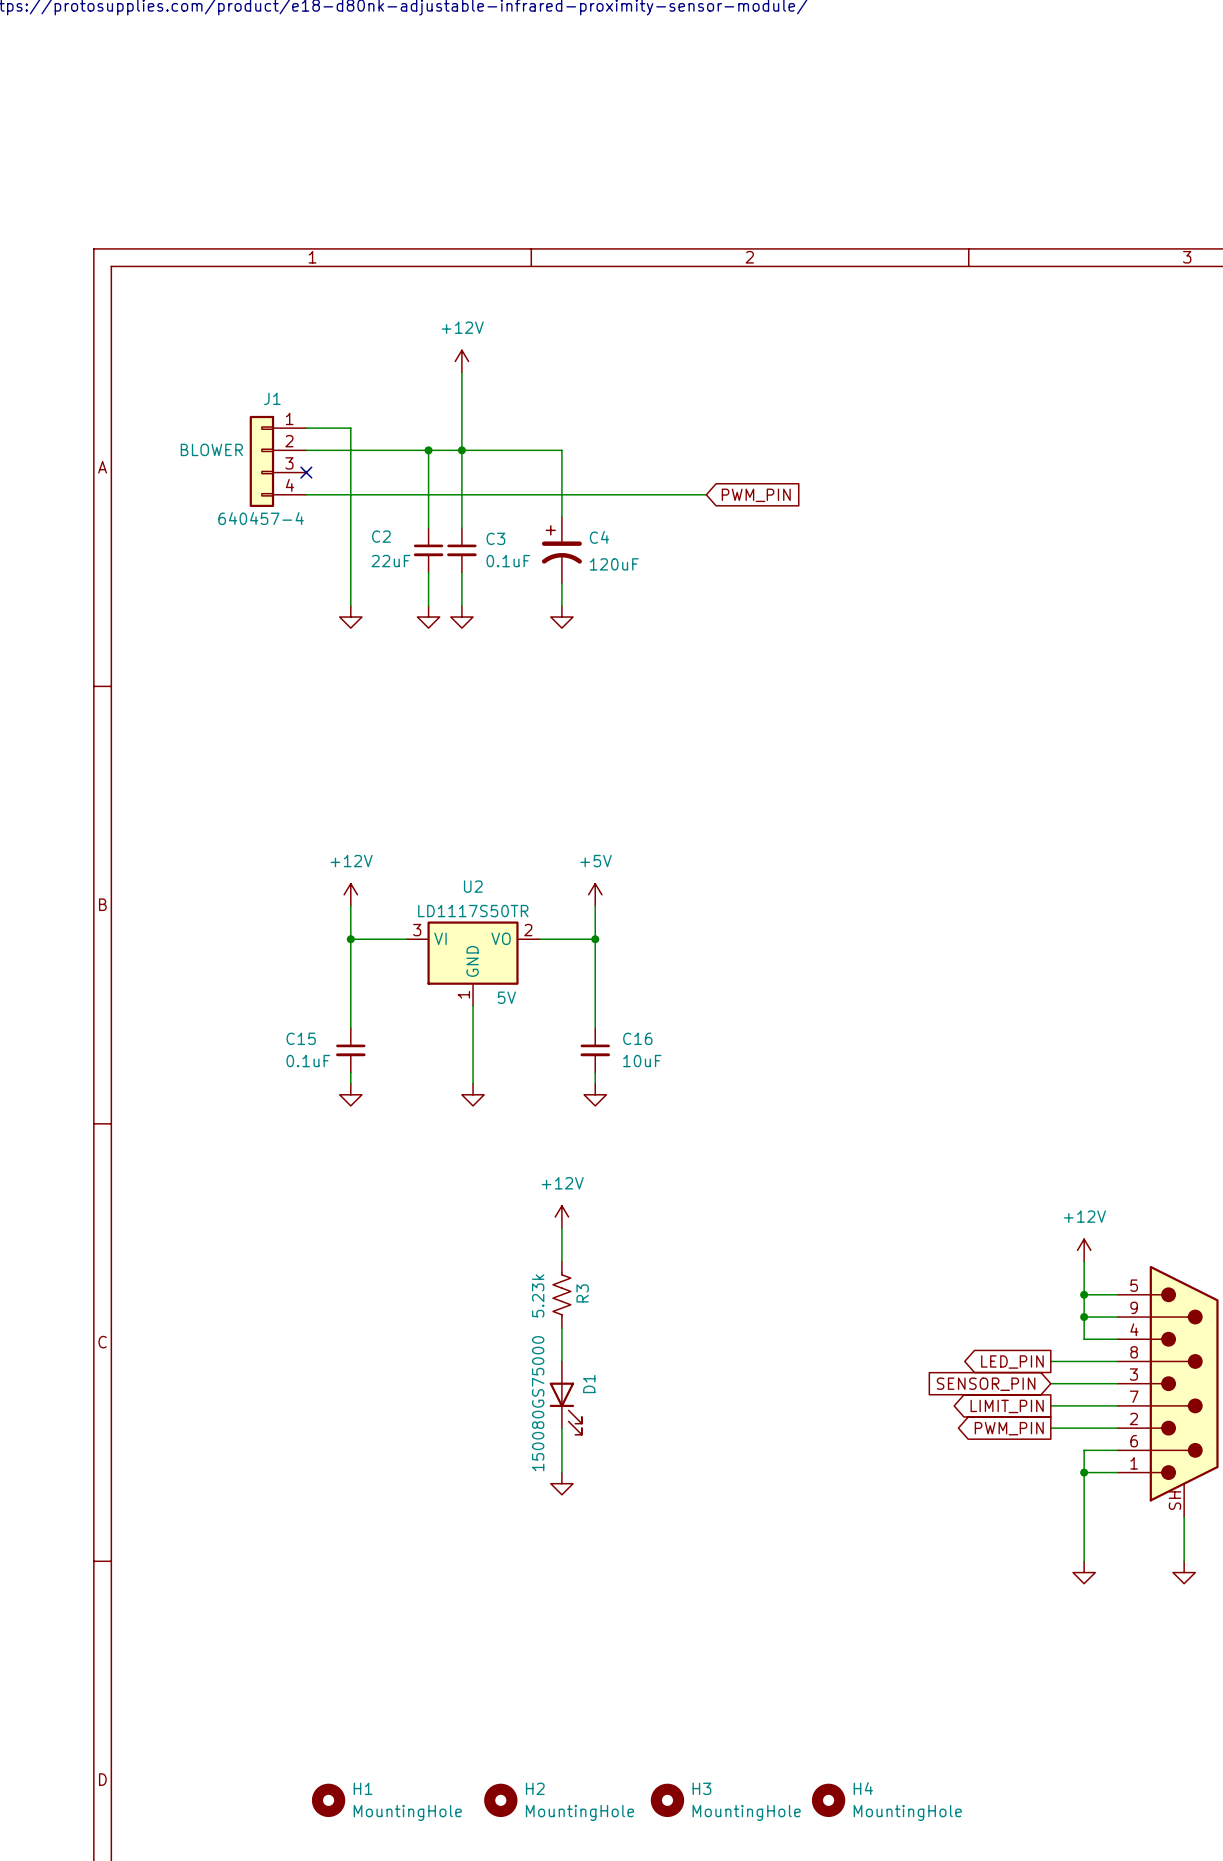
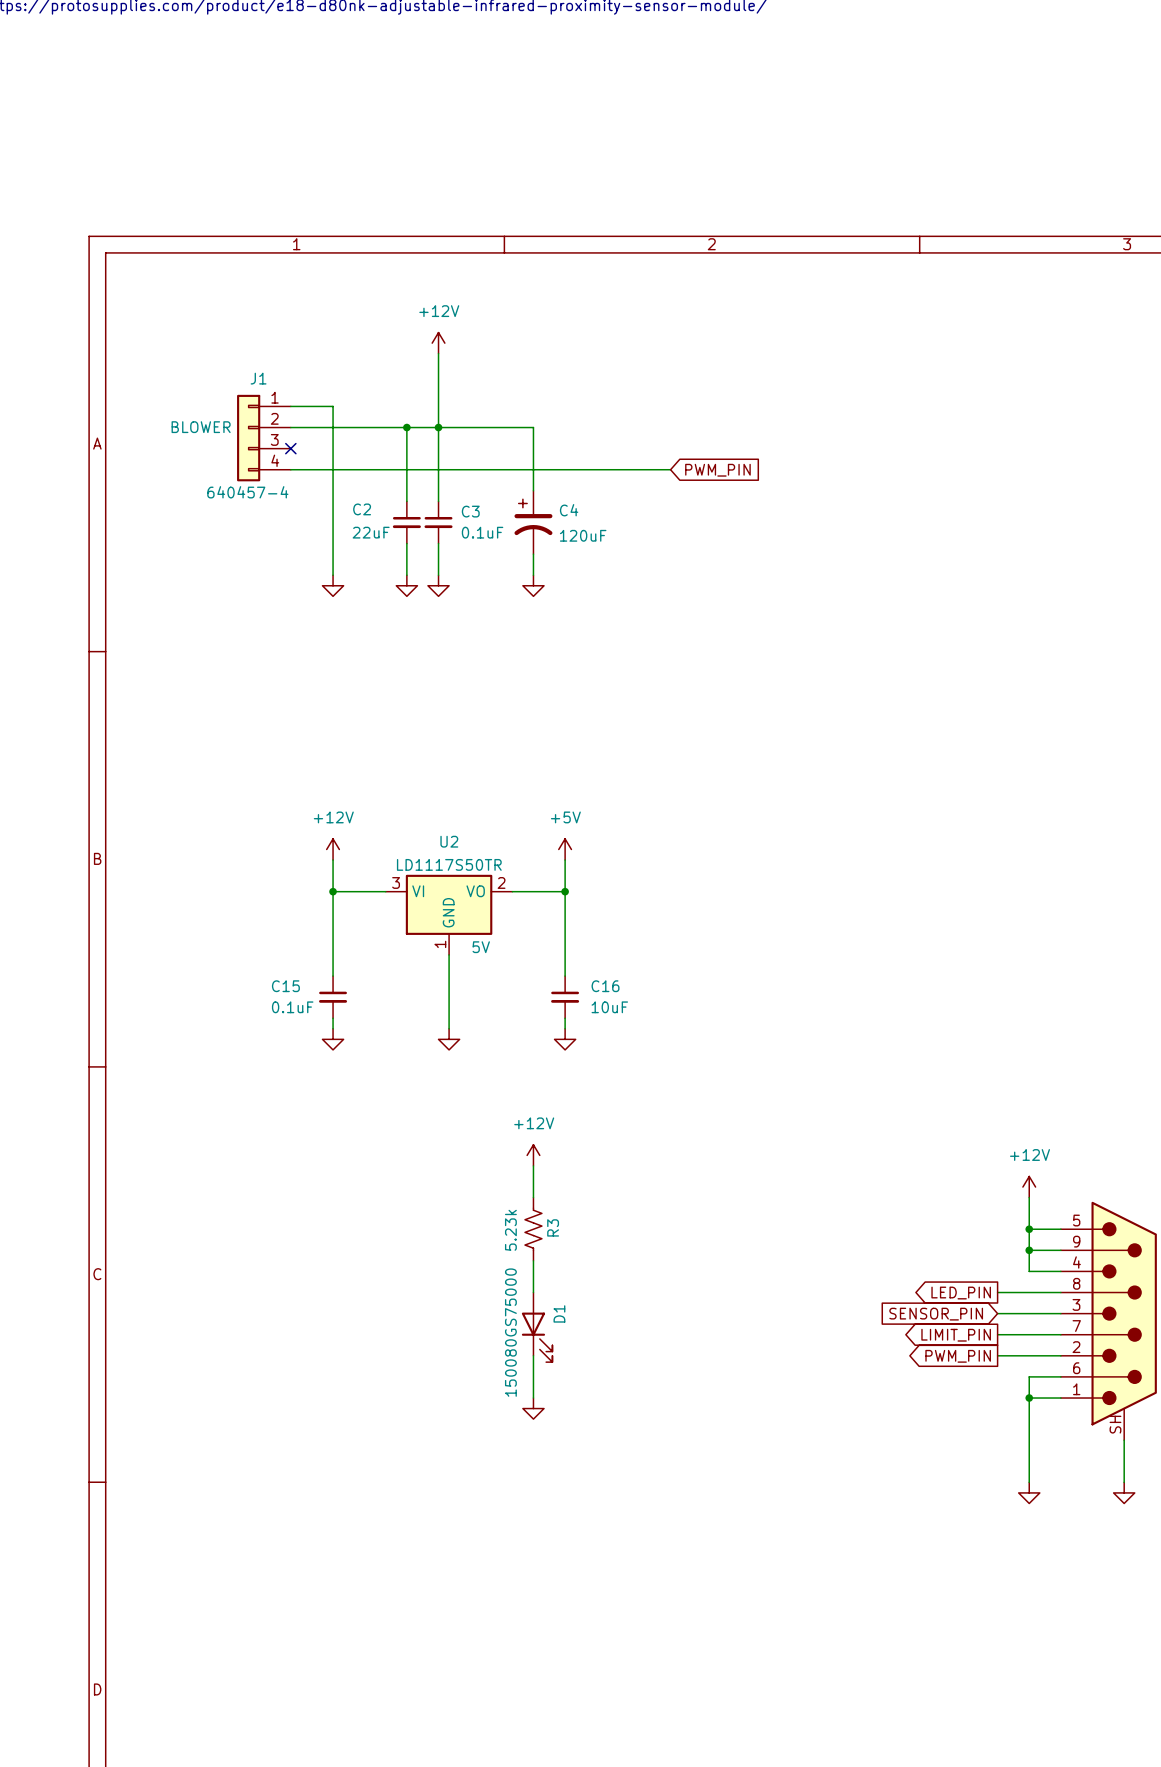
H1: MountingHole (328, 1800) -> none
H2: MountingHole (500, 1800) -> none
H3: MountingHole (667, 1800) -> none
H4: MountingHole (828, 1800) -> none

